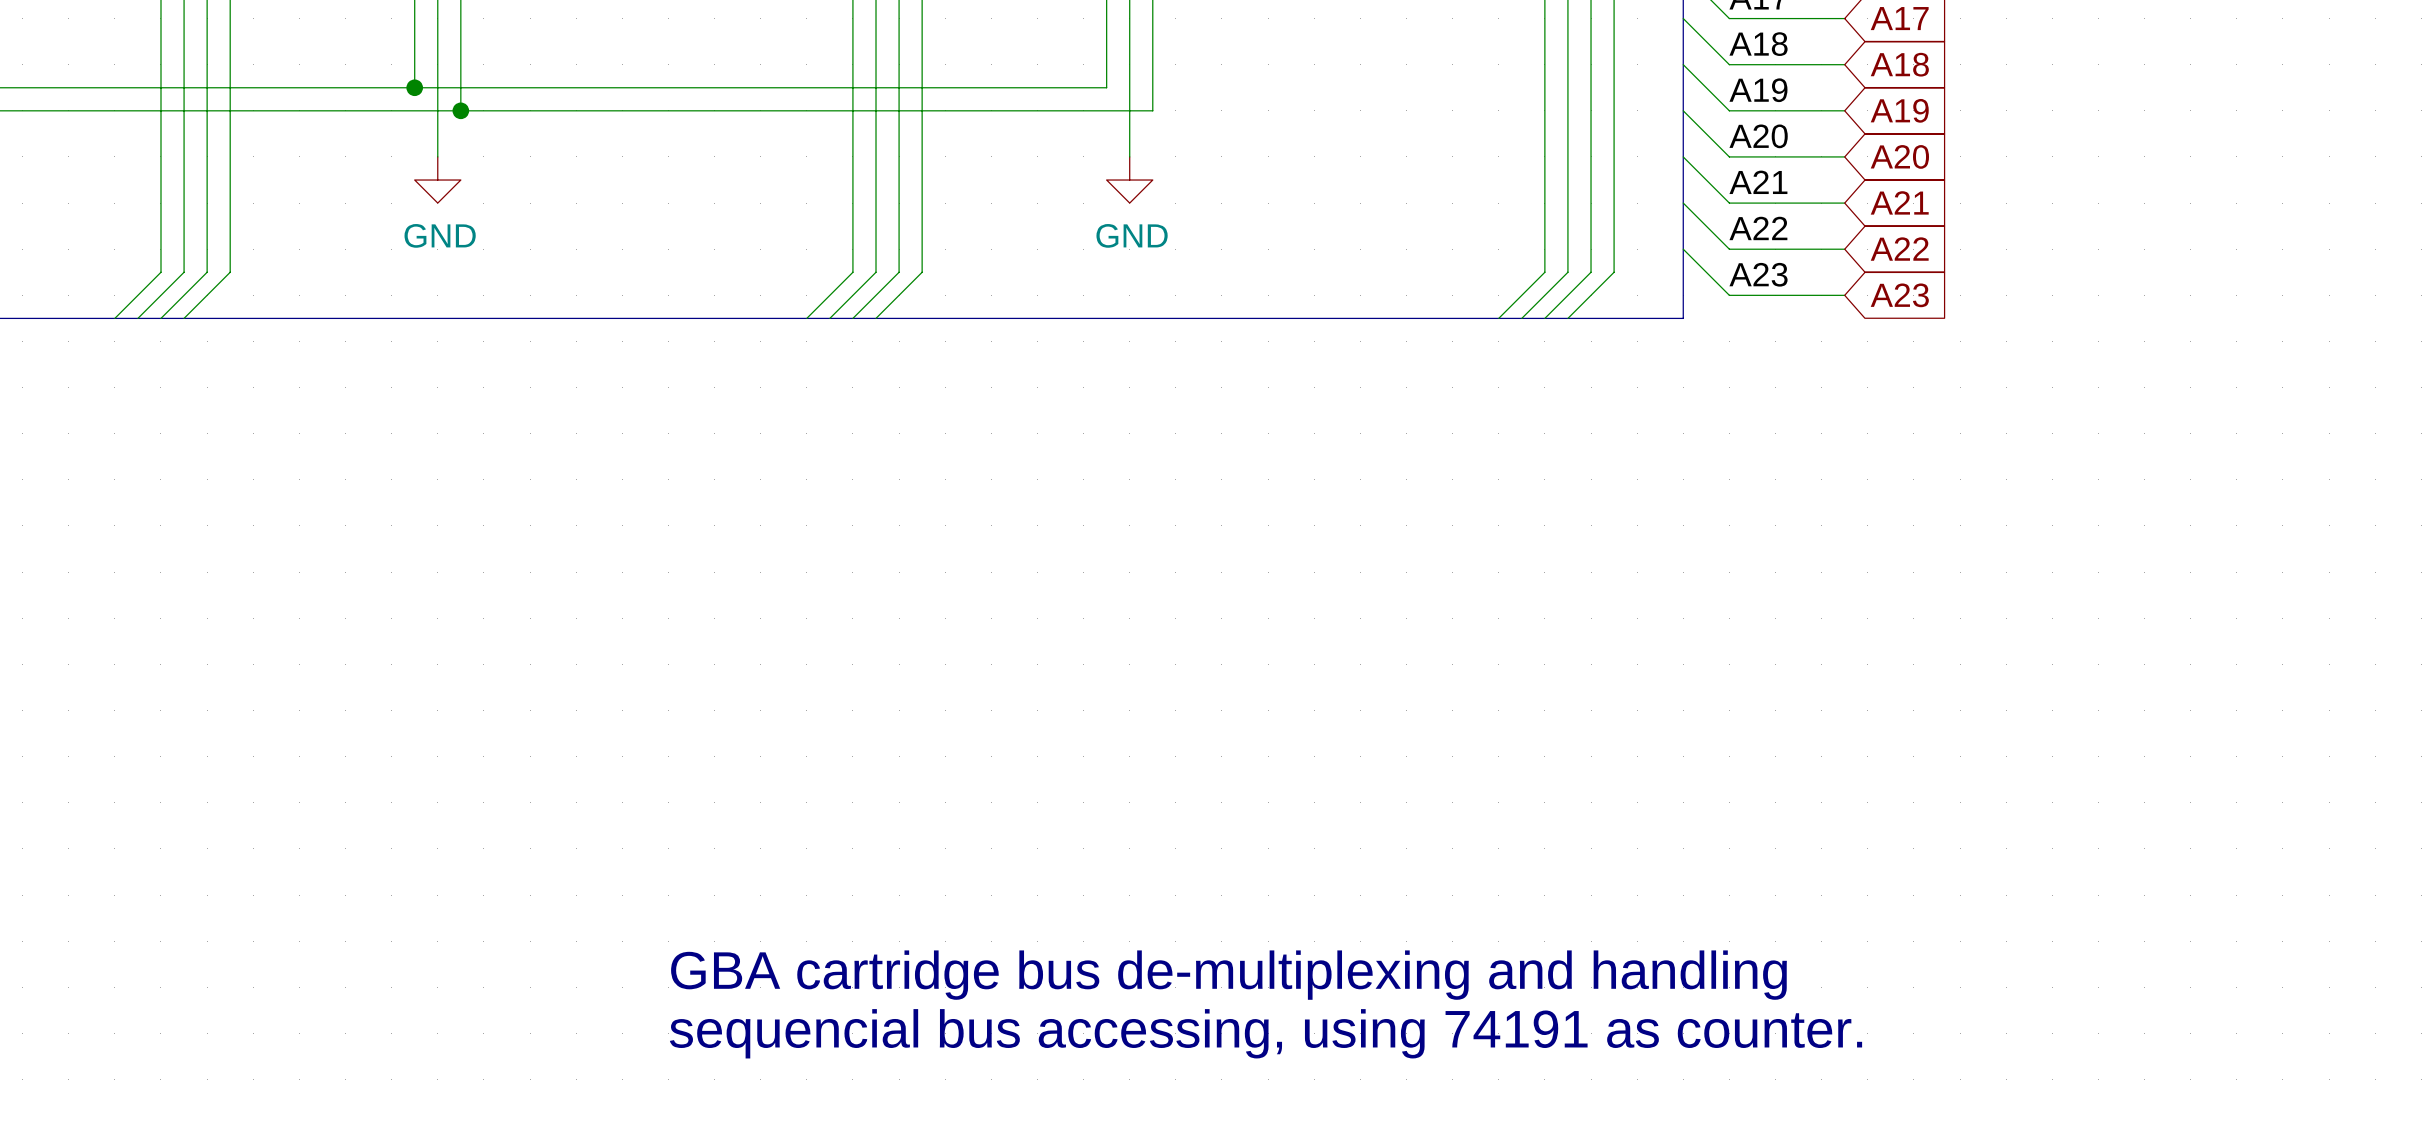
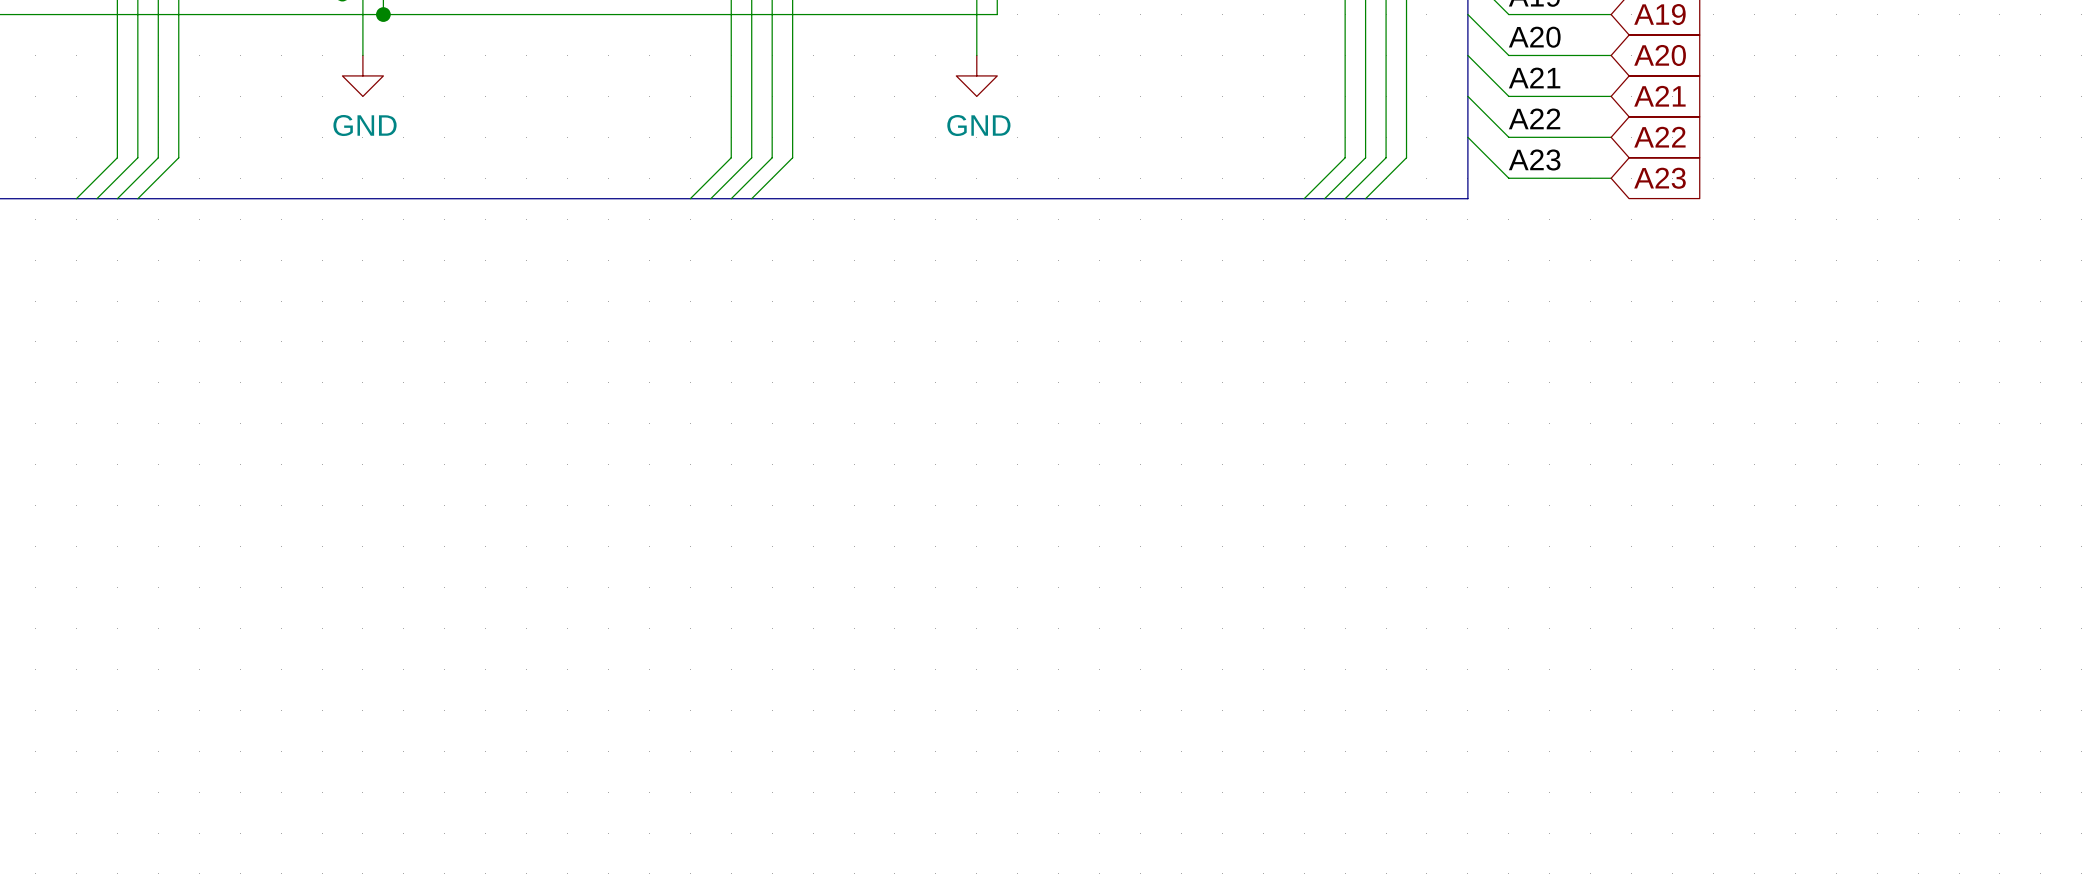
text: GBA cartridge bus de-multiplexing and handling (1228, 975) -> none
text: sequencial bus accessing, using 74191 as counter. (1266, 1033) -> none

